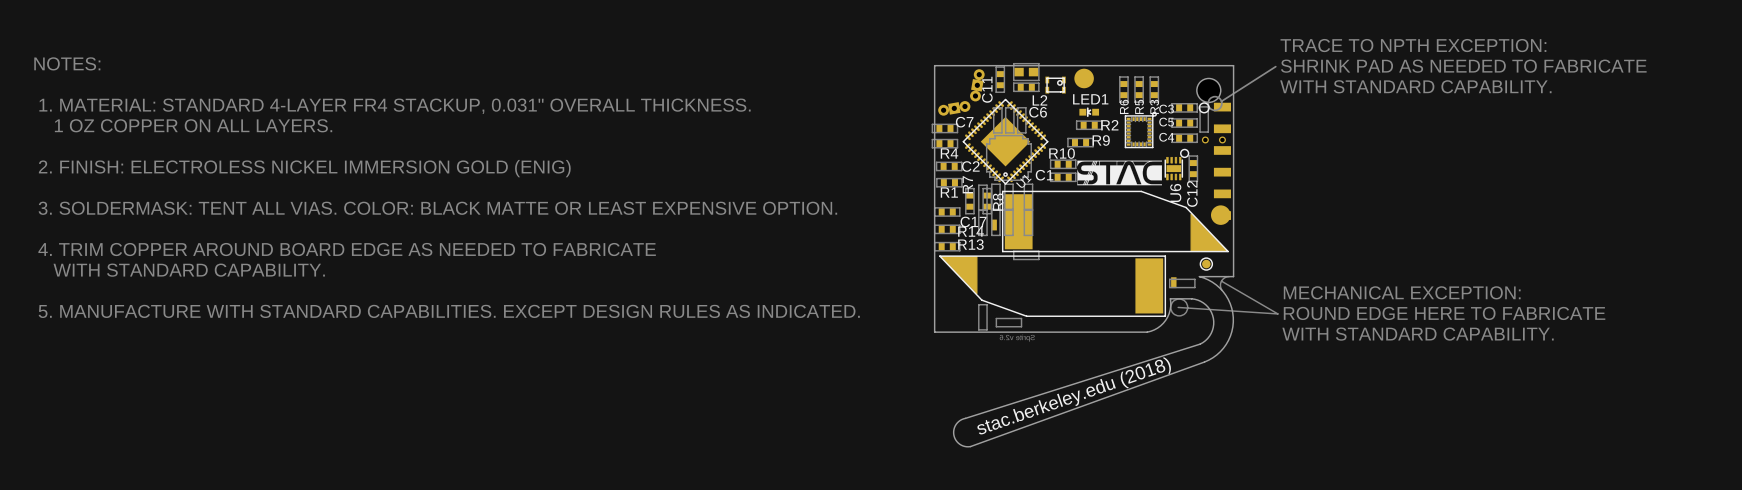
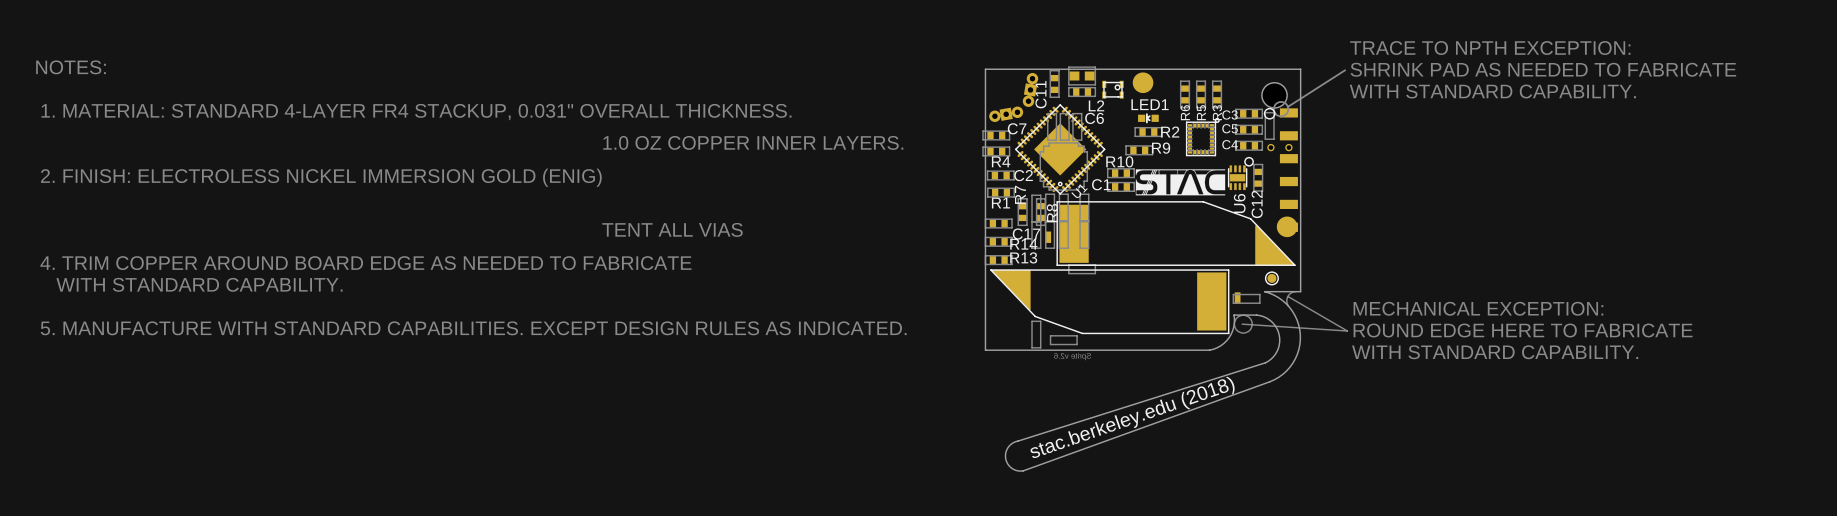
text: 1 OZ COPPER ON ALL LAYERS. (193, 125) -> none
text: none -> 1.0 OZ COPPER INNER LAYERS. (753, 142)
text: 3. SOLDERMASK: TENT ALL VIAS. COLOR: BLACK MATTE OR LEAST EXPENSIVE OPTION. (437, 208) -> none
text: none -> TENT ALL VIAS (672, 229)

